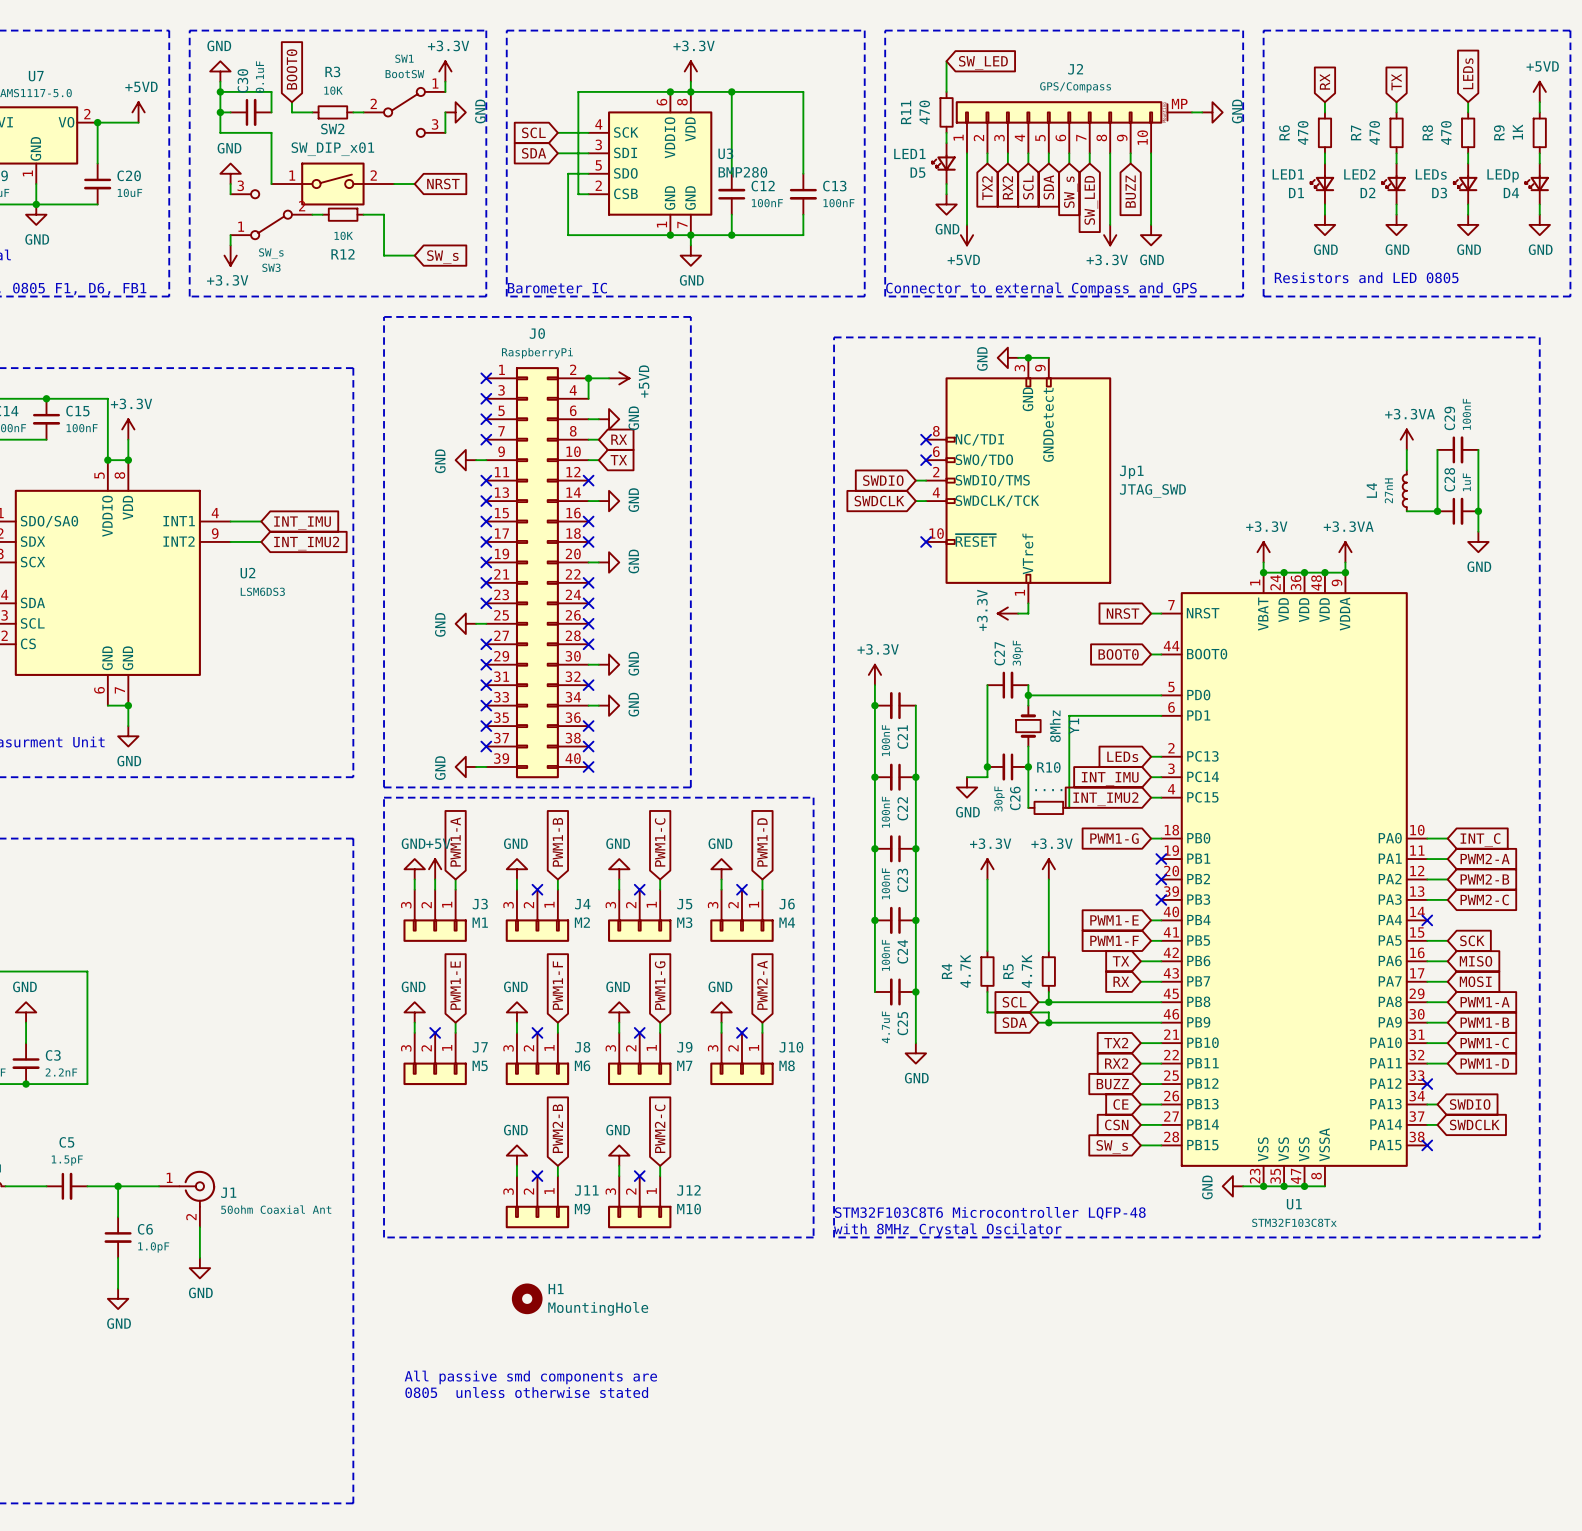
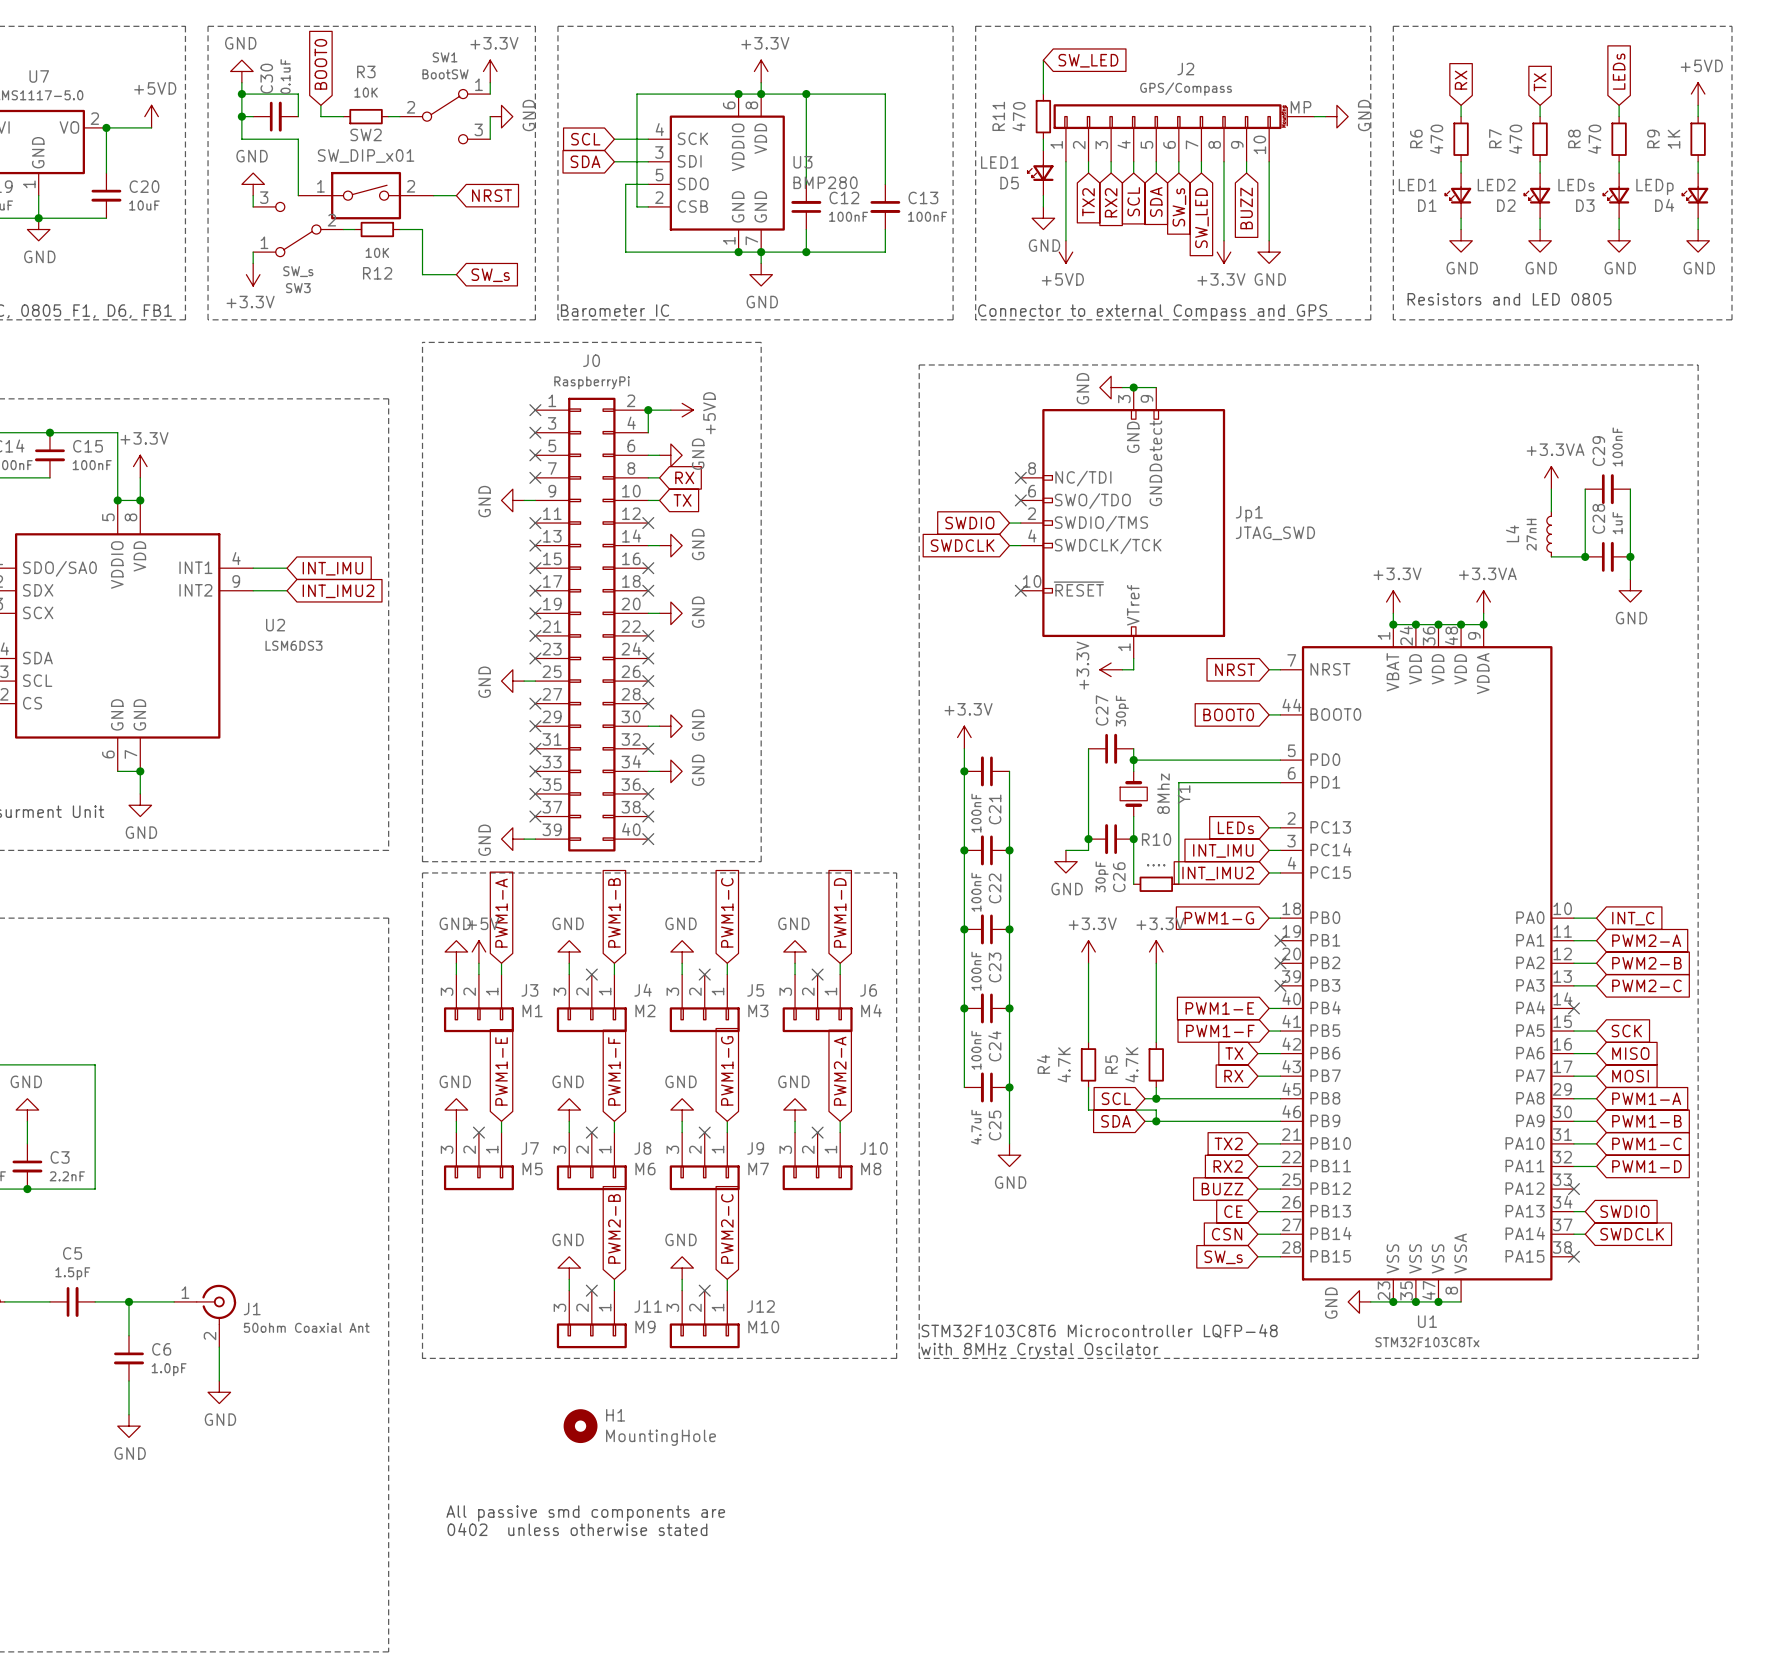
text: 0805 unless otherwise stated (526, 1392) -> 0402 unless otherwise stated (577, 1529)

